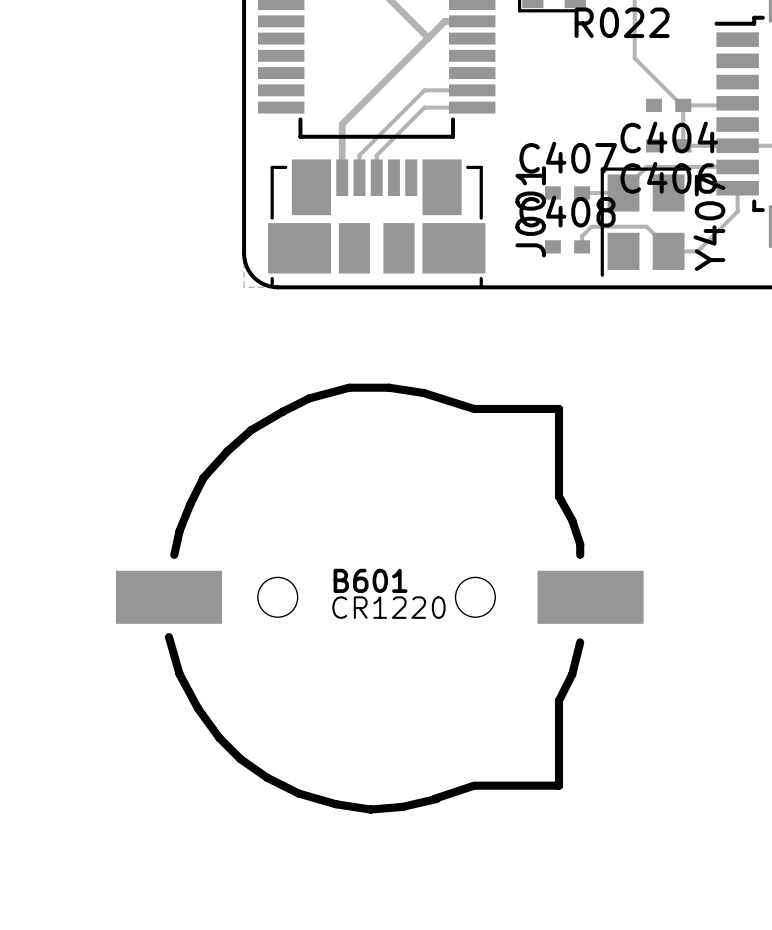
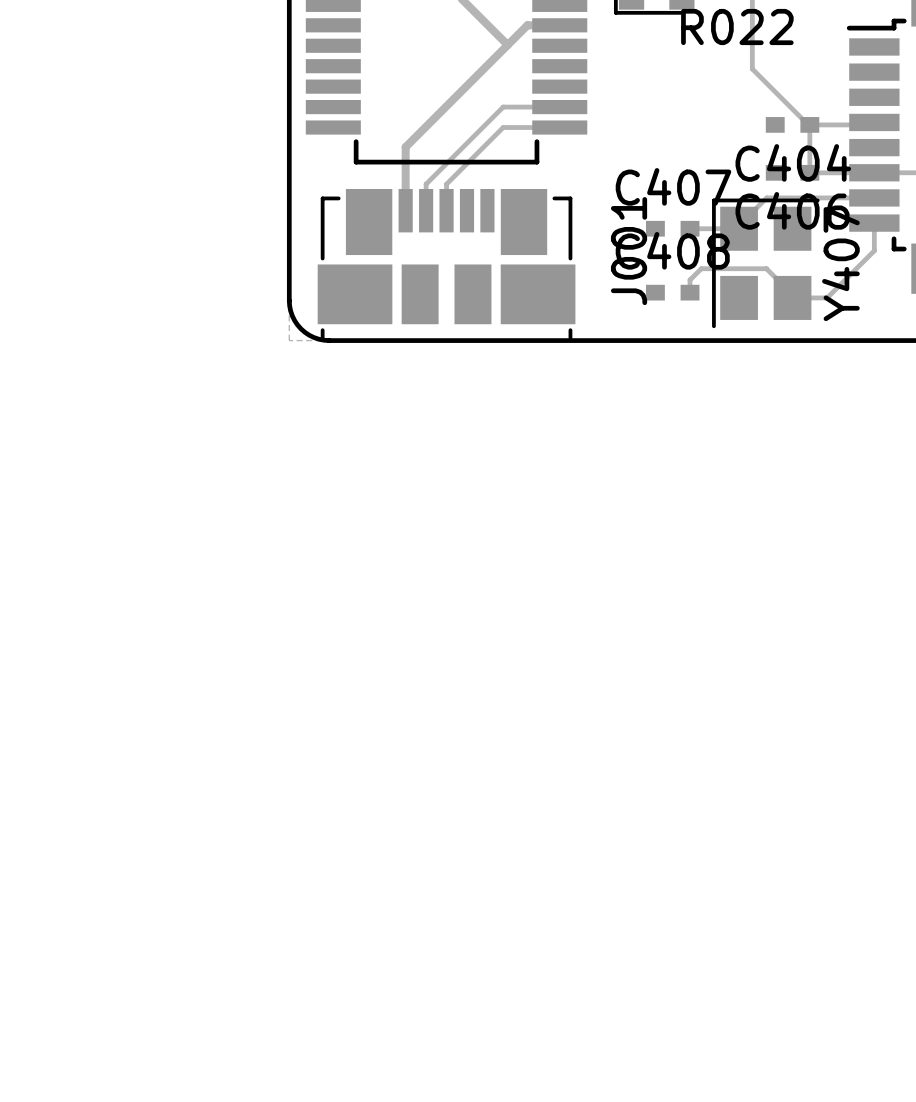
B601: CR1220 (379, 598) -> none

